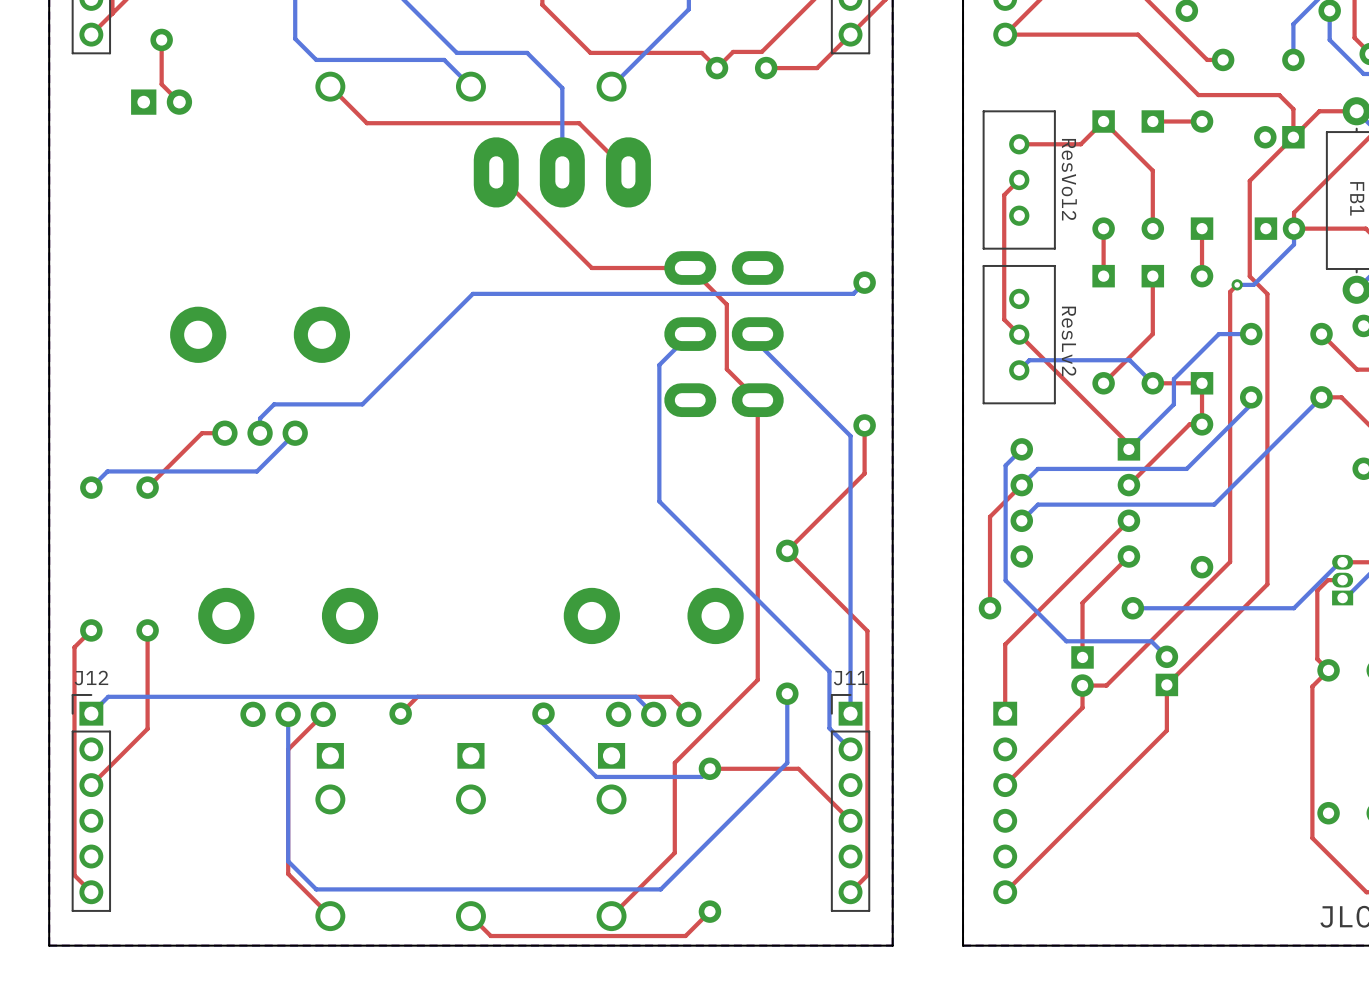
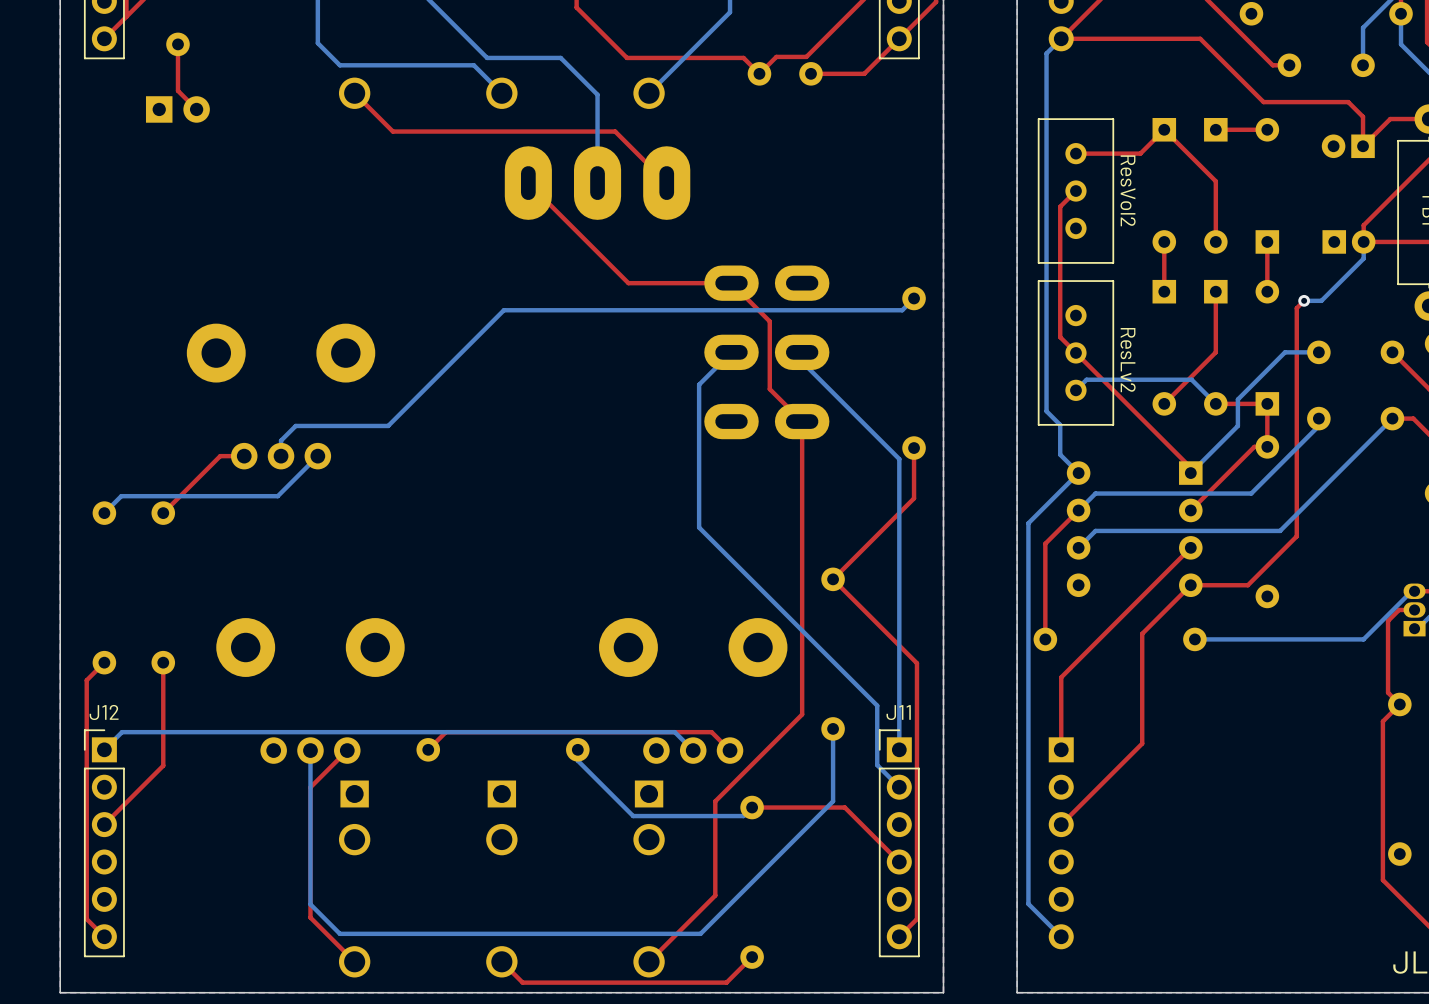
bottom track: none -> (1061, 38) (1046, 53) (1046, 411) (1060, 424) (1060, 454) (1078, 473)
top track: (1293, 137) (1249, 180) (1249, 276) (1267, 294) (1267, 584) (1166, 684) (1166, 730) (1005, 892) -> none
bottom track: (1005, 465) (1005, 580) (1066, 641) (1151, 641) (1166, 656) -> (1061, 489) (1028, 523) (1028, 903) (1061, 936)
top track: (1230, 509) (1230, 561) (1106, 685) (1082, 685) -> (1296, 536) (1247, 585) (1190, 585)
top track: none -> (1142, 690) (1142, 720)
part: (1166, 670) -> none
part: (1082, 671) -> none

